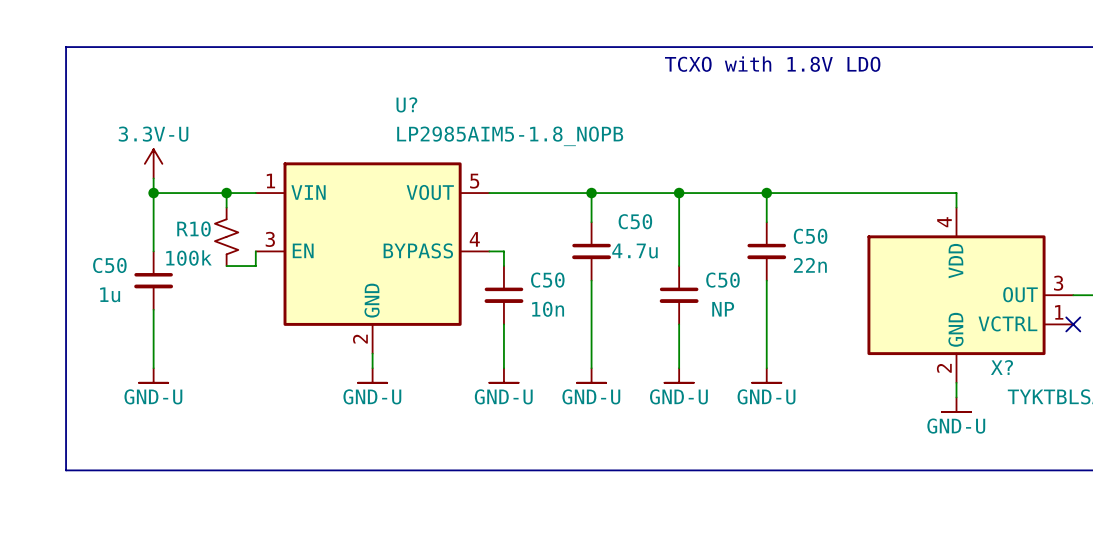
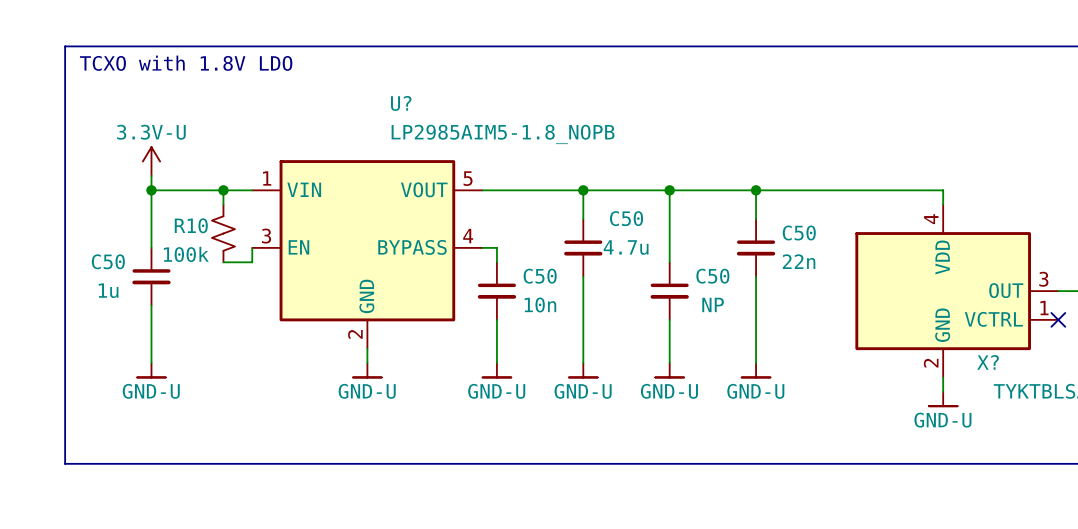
text: none -> TCXO with 1.8V LDO (186, 63)
text: TCXO with 1.8V LDO (772, 64) -> none

